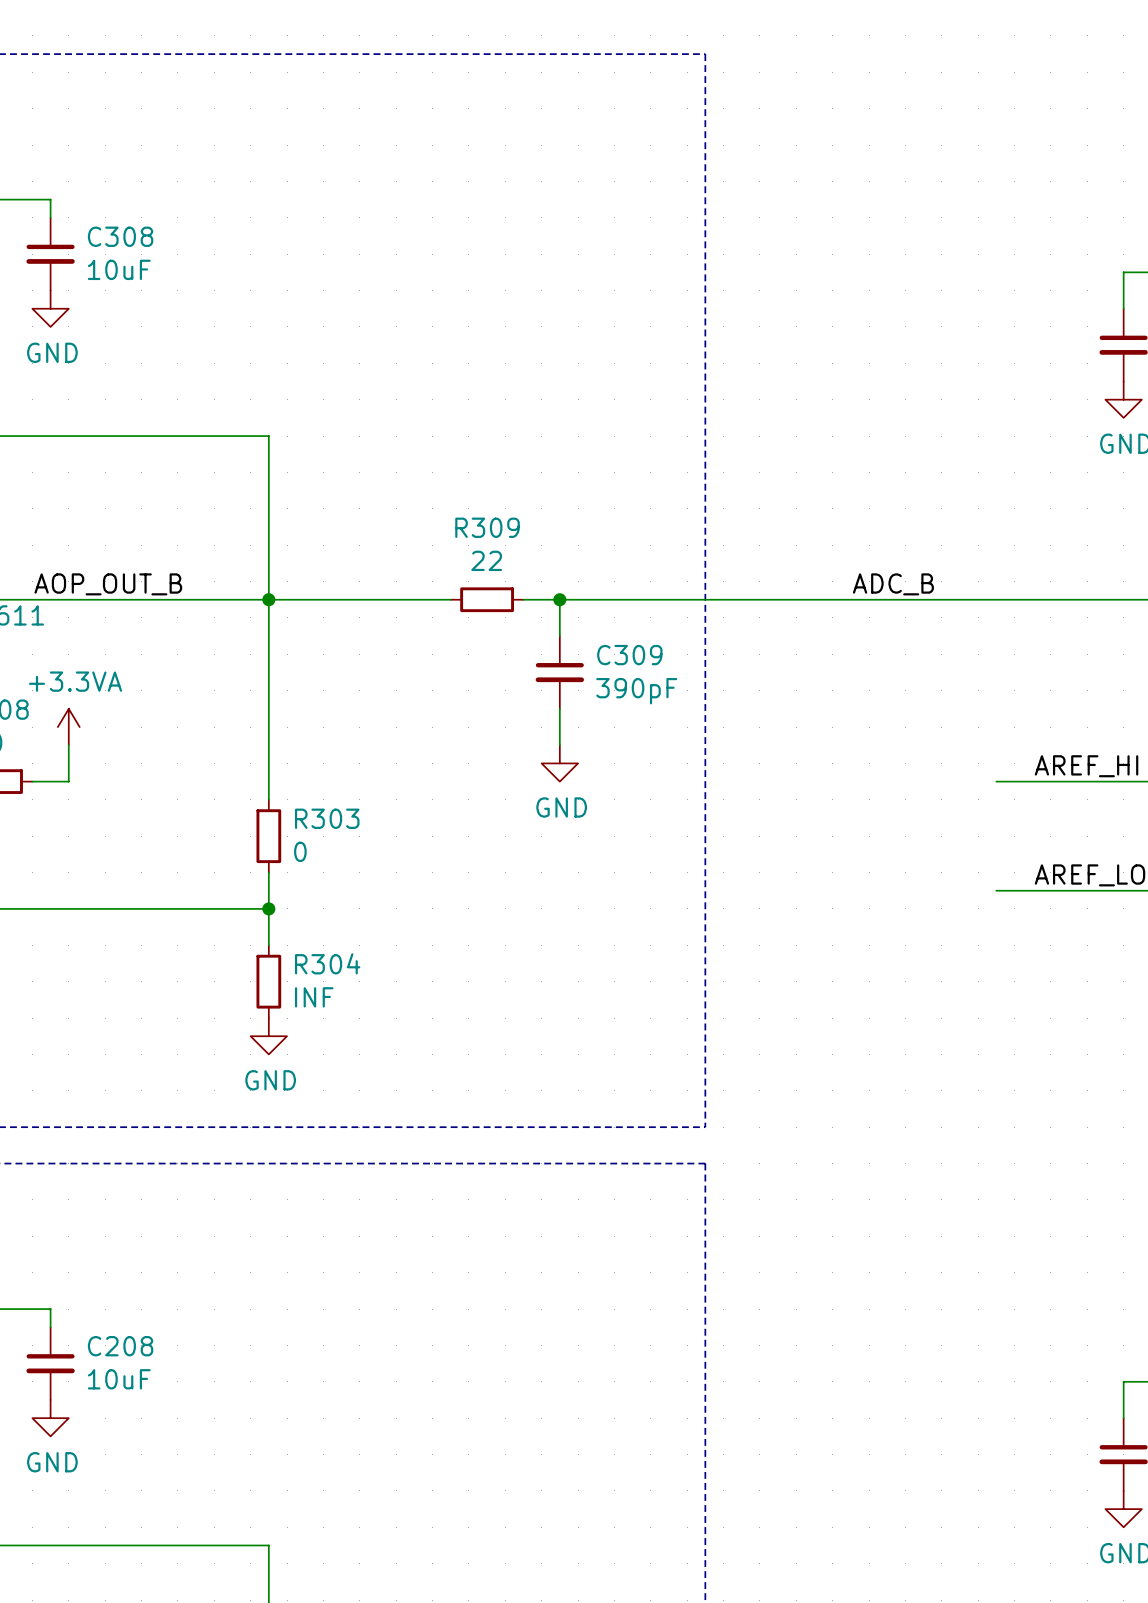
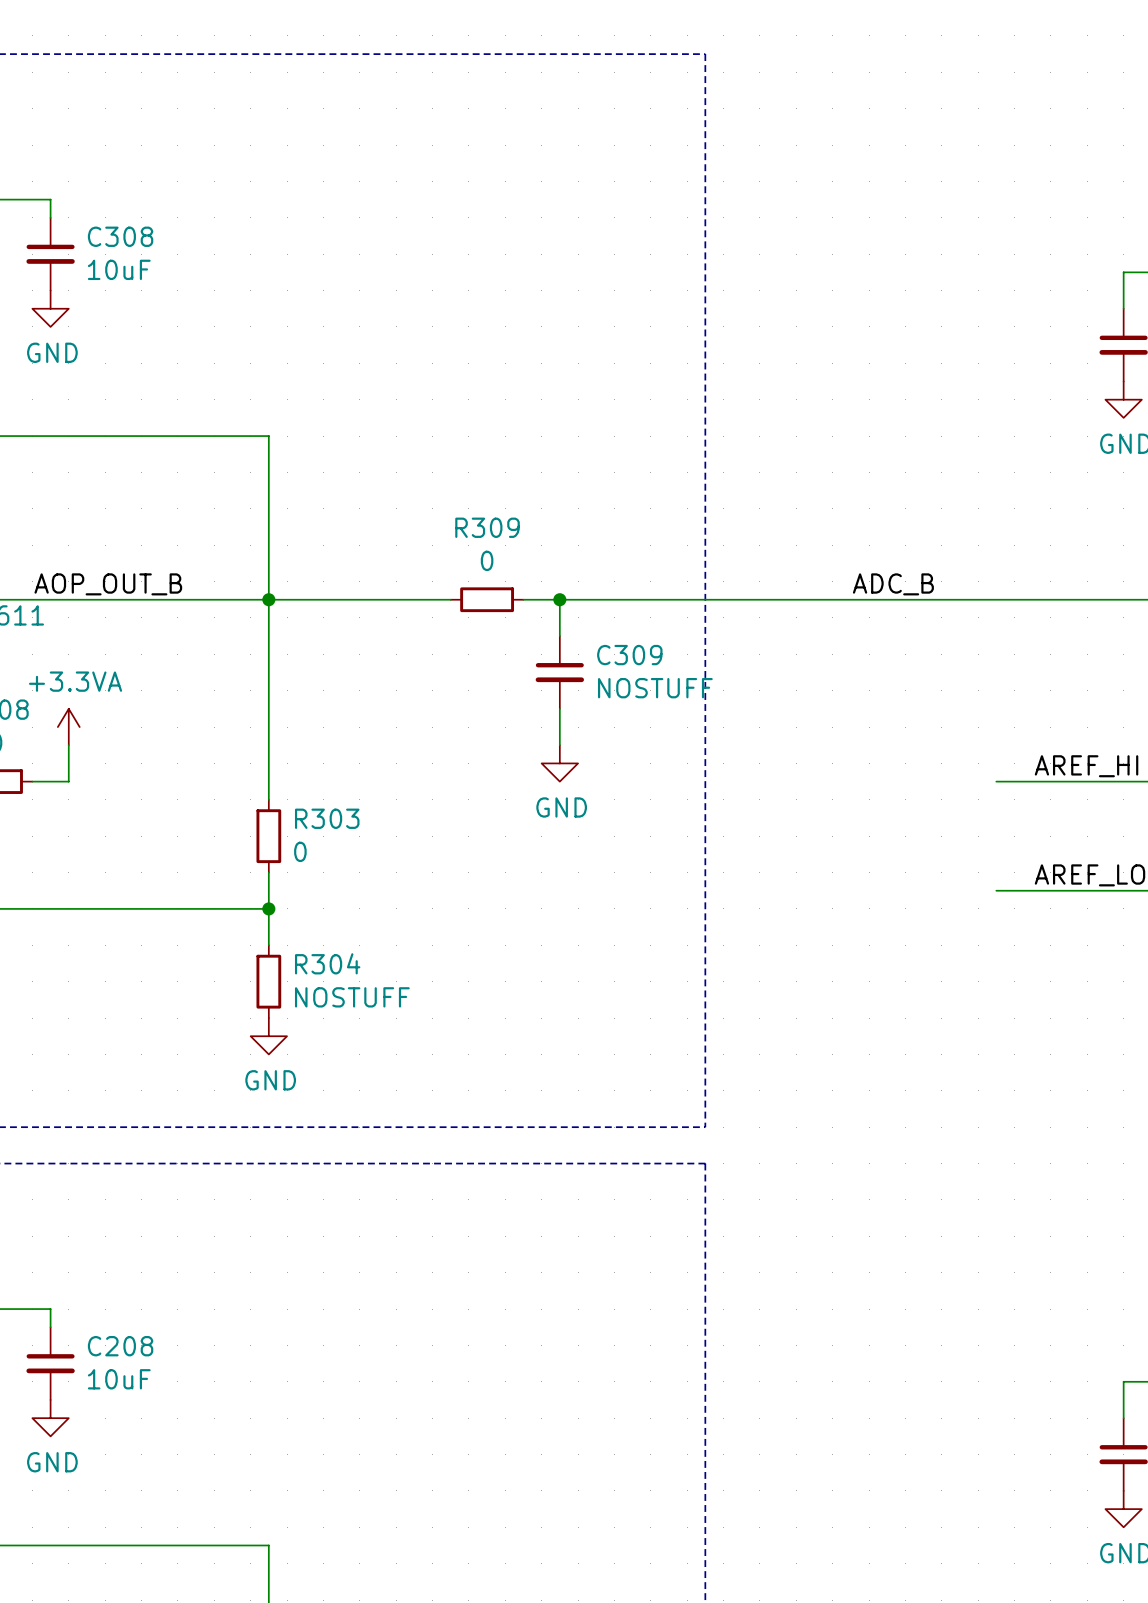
R309 value: 22 (486, 560) -> 0 (487, 560)
C309 value: 390pF (636, 691) -> NOSTUFF (655, 688)
R304 value: INF (314, 997) -> NOSTUFF (352, 997)

